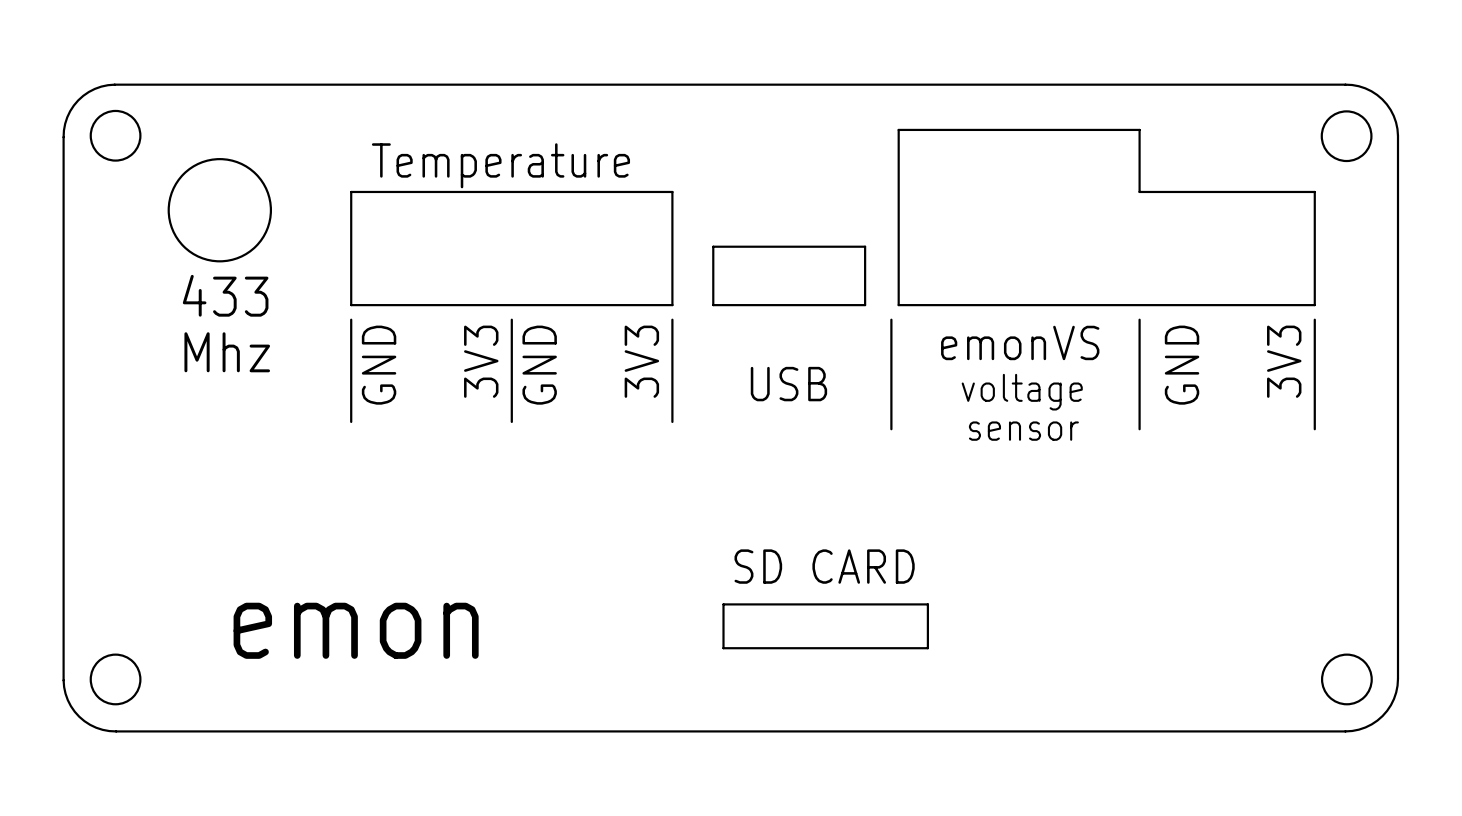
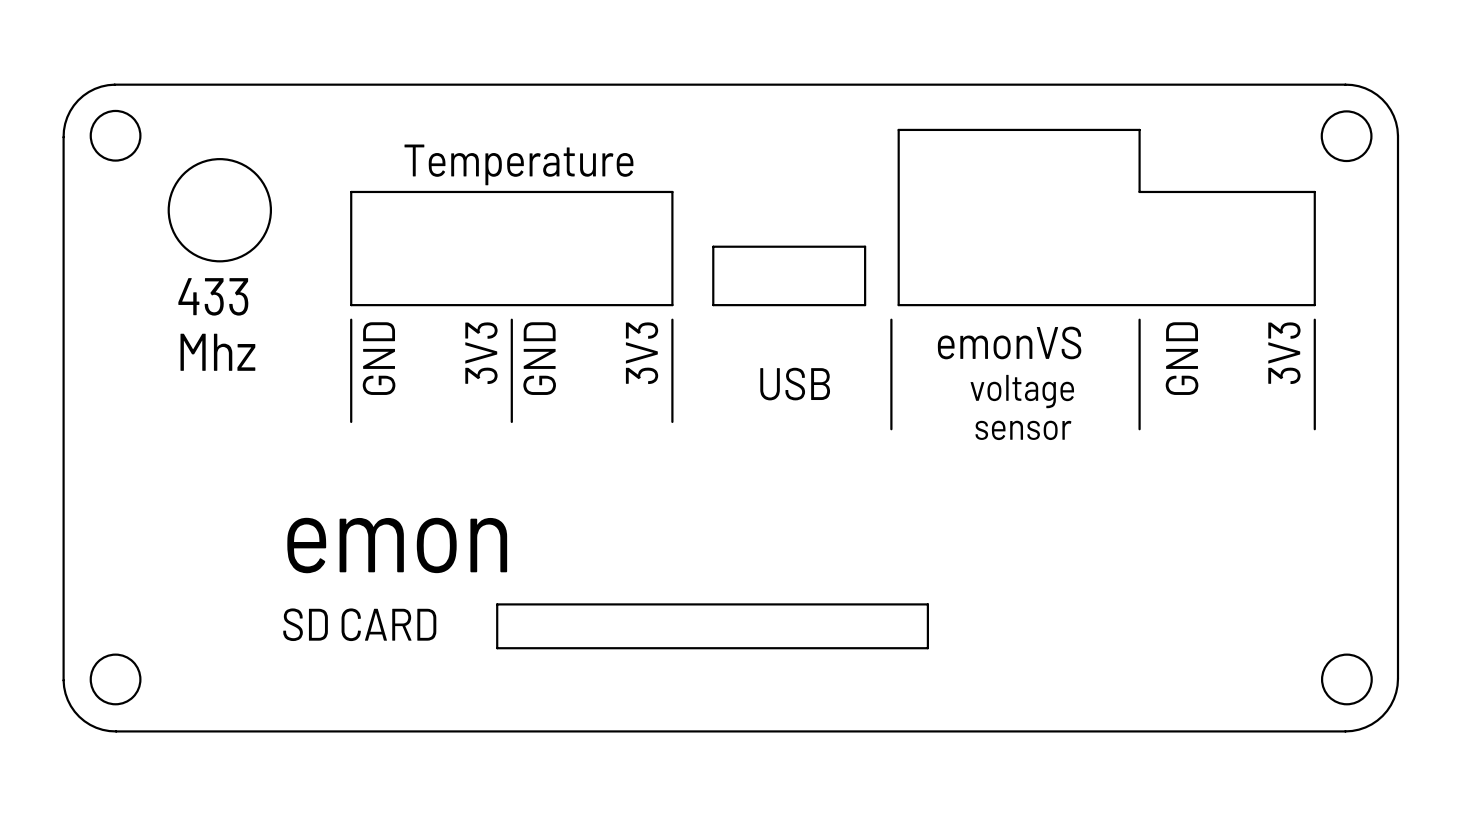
text: SD CARD (824, 566) -> none
board edge: (723, 604) (723, 648) -> (723, 604) (497, 604) (497, 648) (723, 648)
text: none -> SD CARD (359, 624)
text position: emon (356, 630) -> emon (397, 545)

